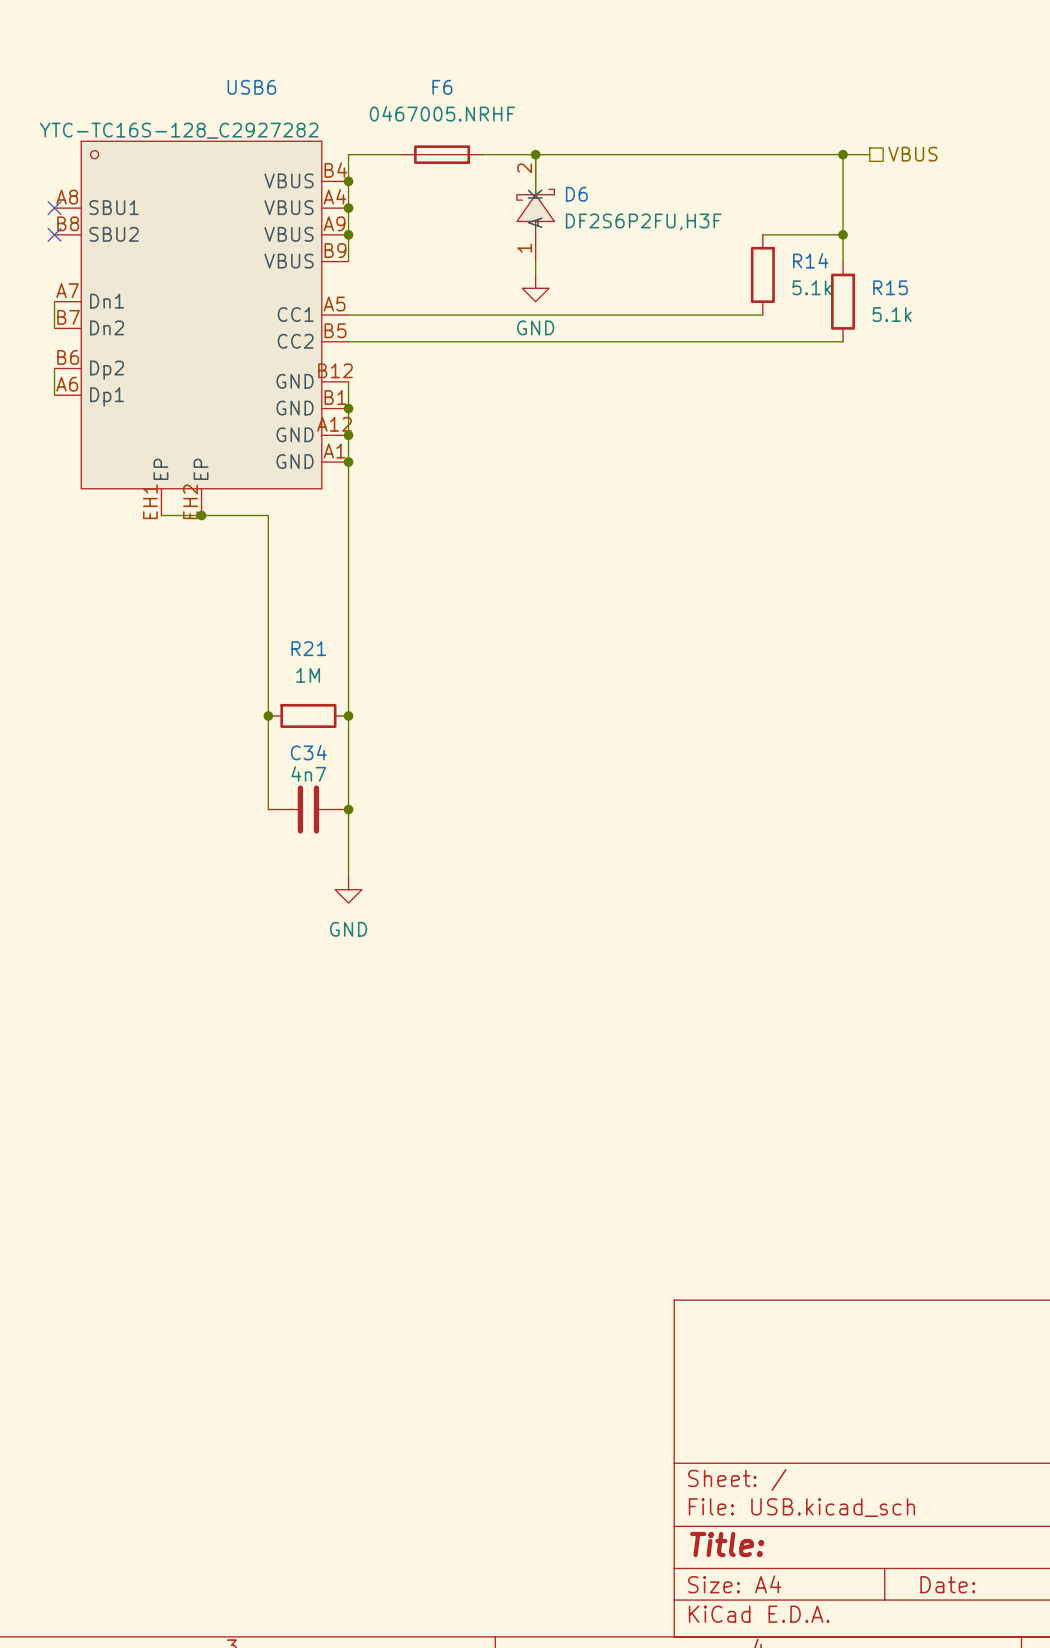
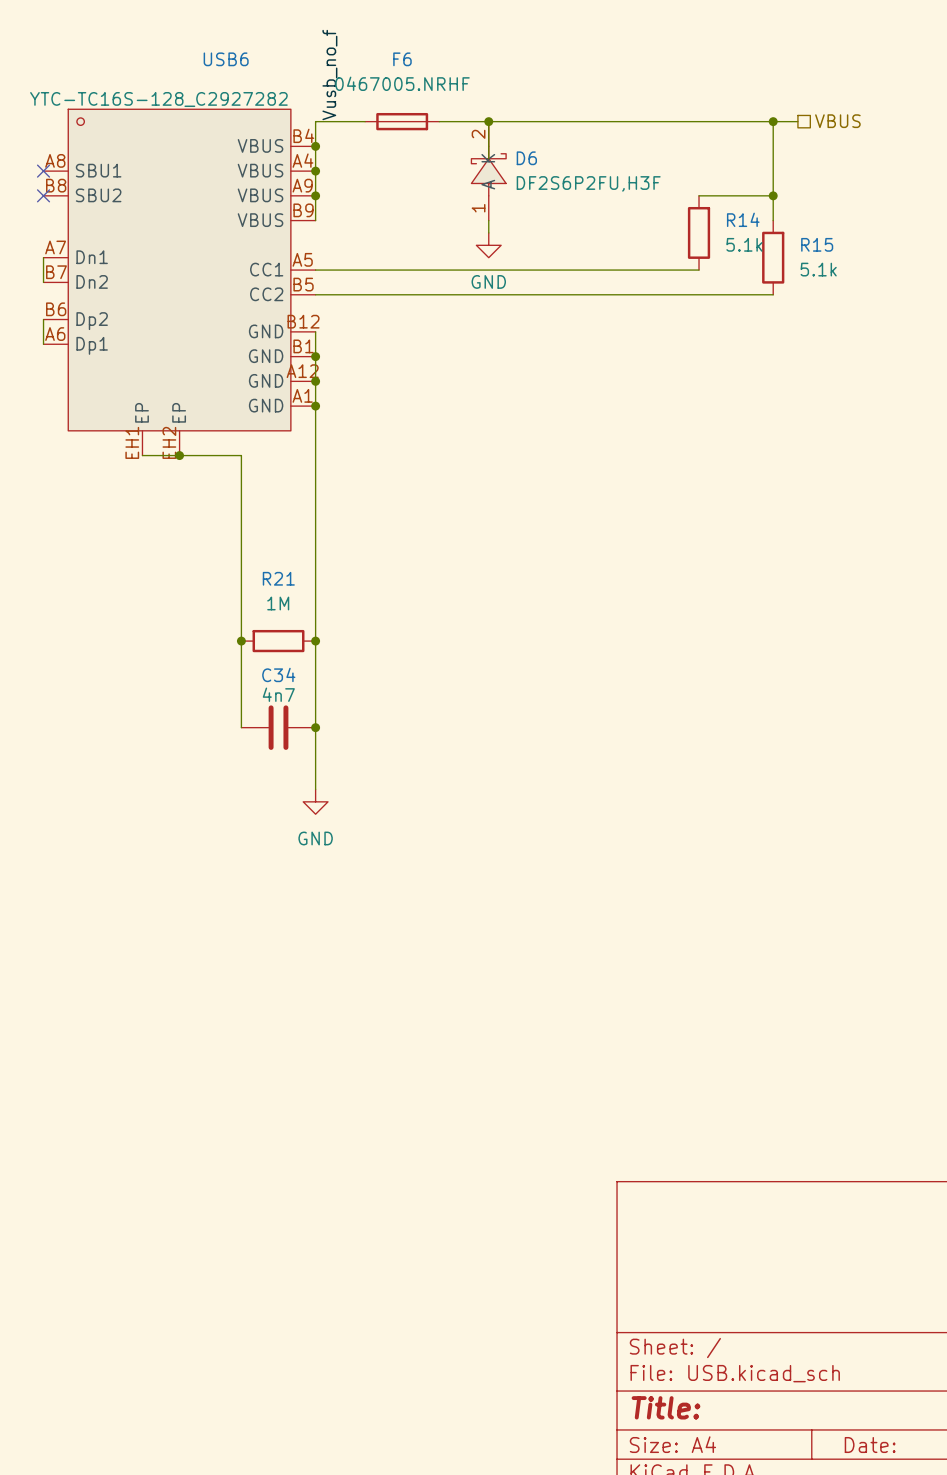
label: none -> Vusb_no_f (329, 75)

